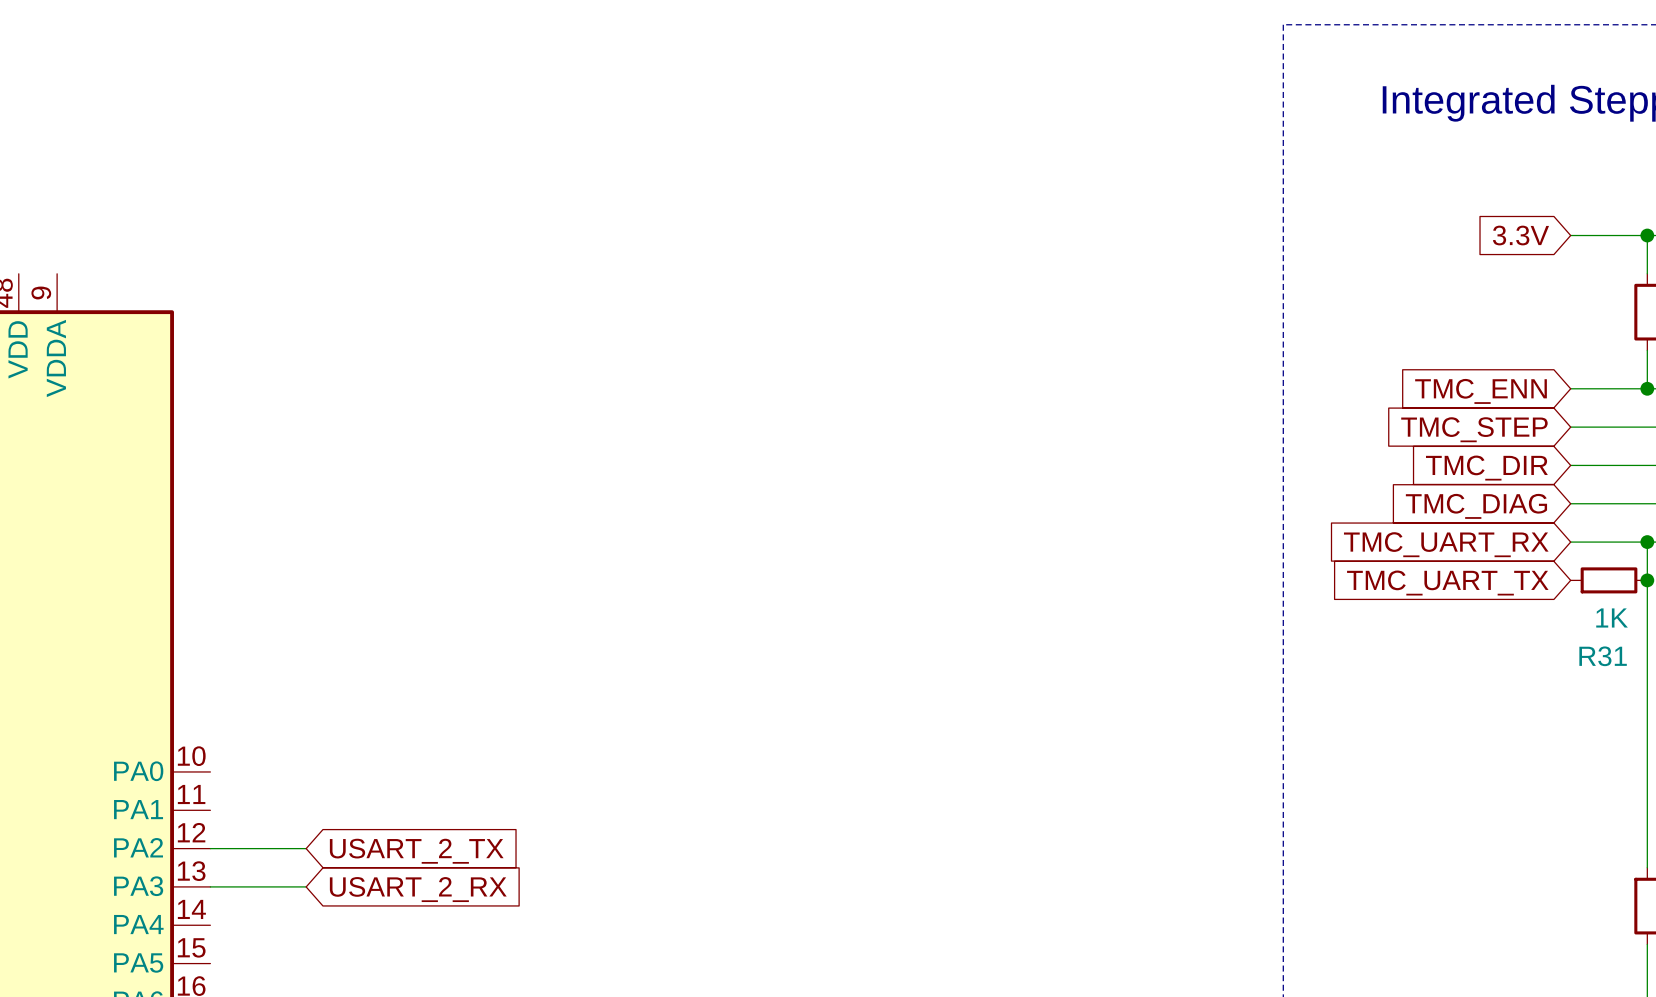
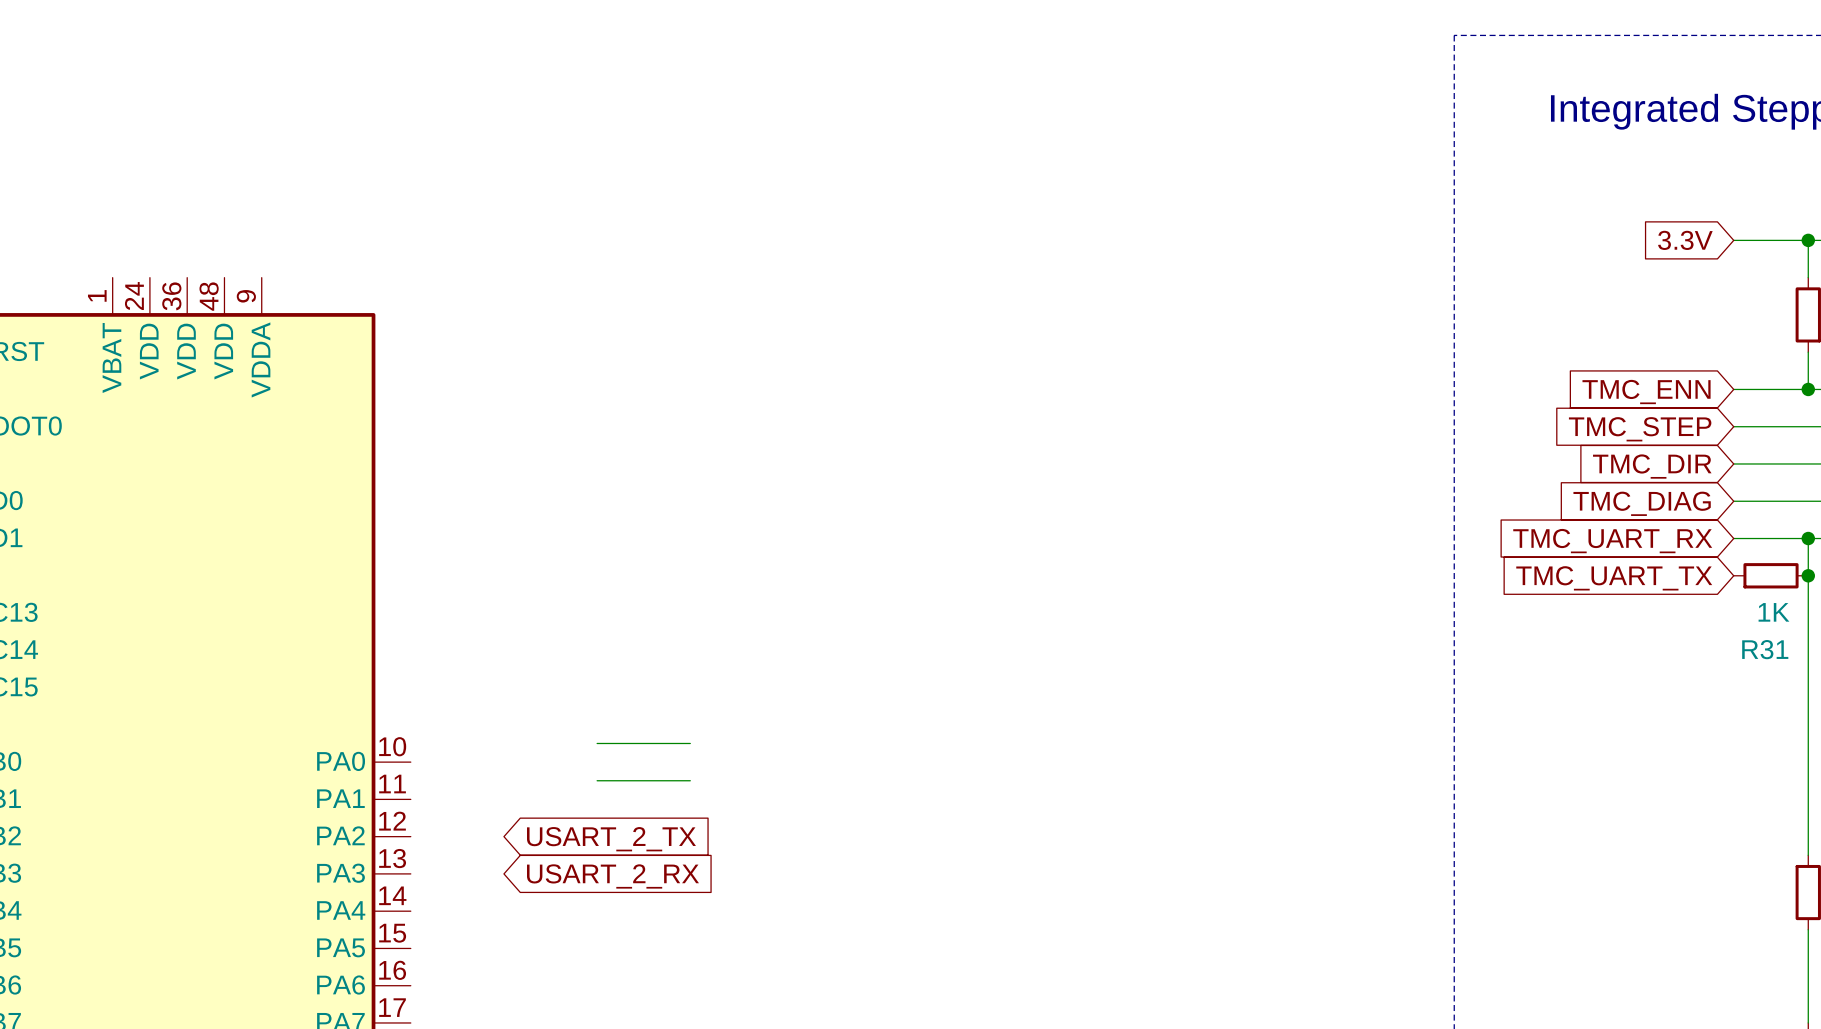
wire: (210, 848) (306, 848) -> (597, 743) (690, 743)
wire: (210, 886) (306, 886) -> (597, 780) (690, 780)

